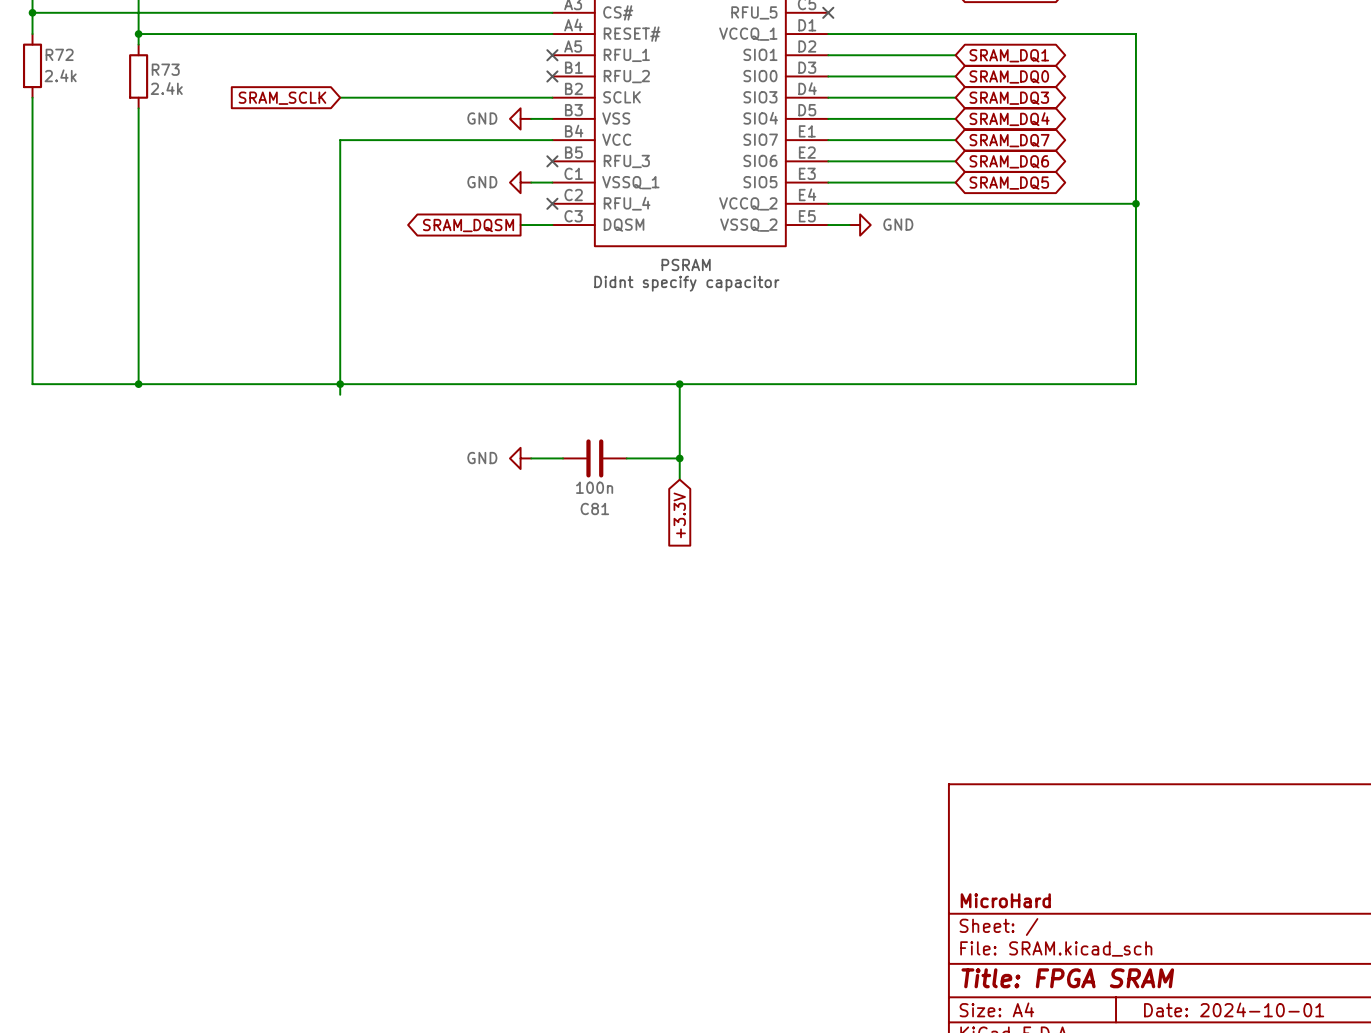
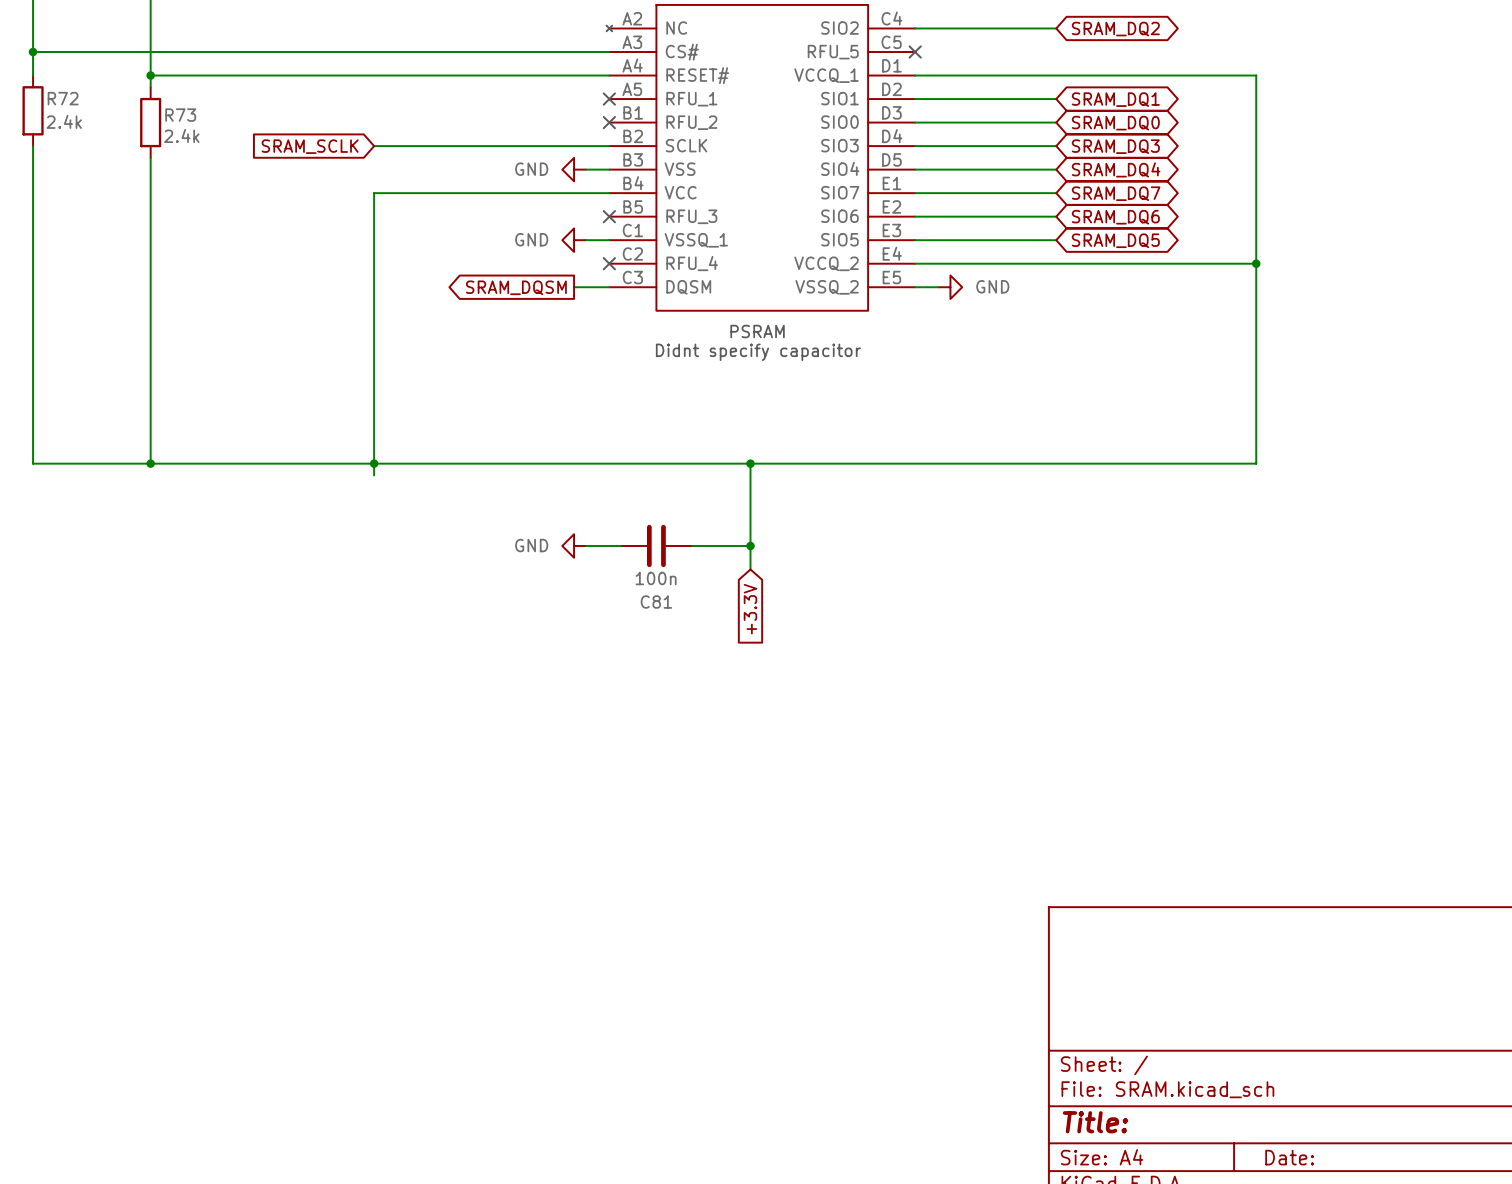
title block: MicroHard (1005, 900) -> none
title block: Title: FPGA SRAM (1067, 978) -> Title: (1095, 1122)
title block: Date: 2024-10-01 (1234, 1009) -> Date: (1289, 1157)

